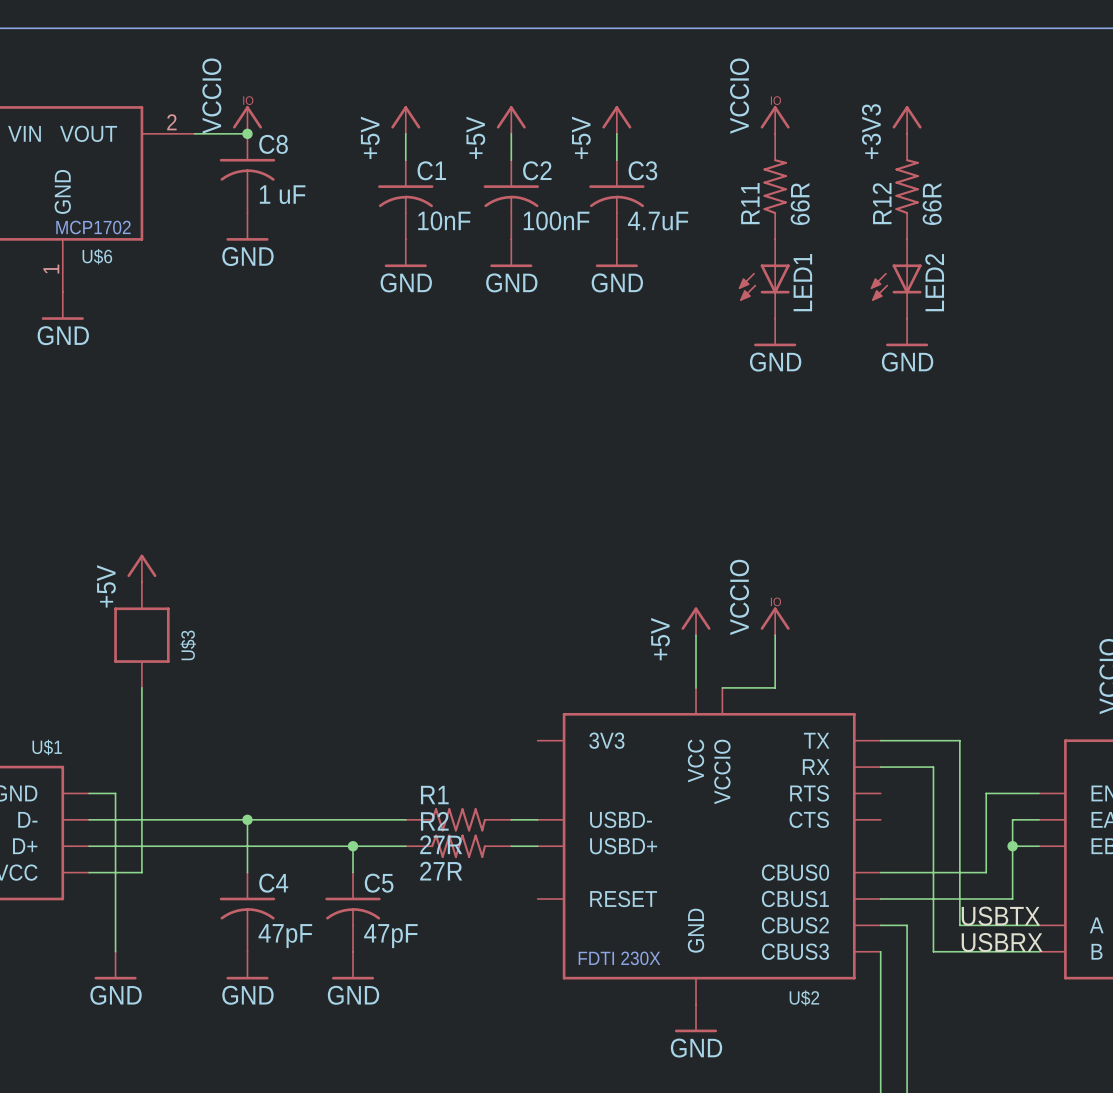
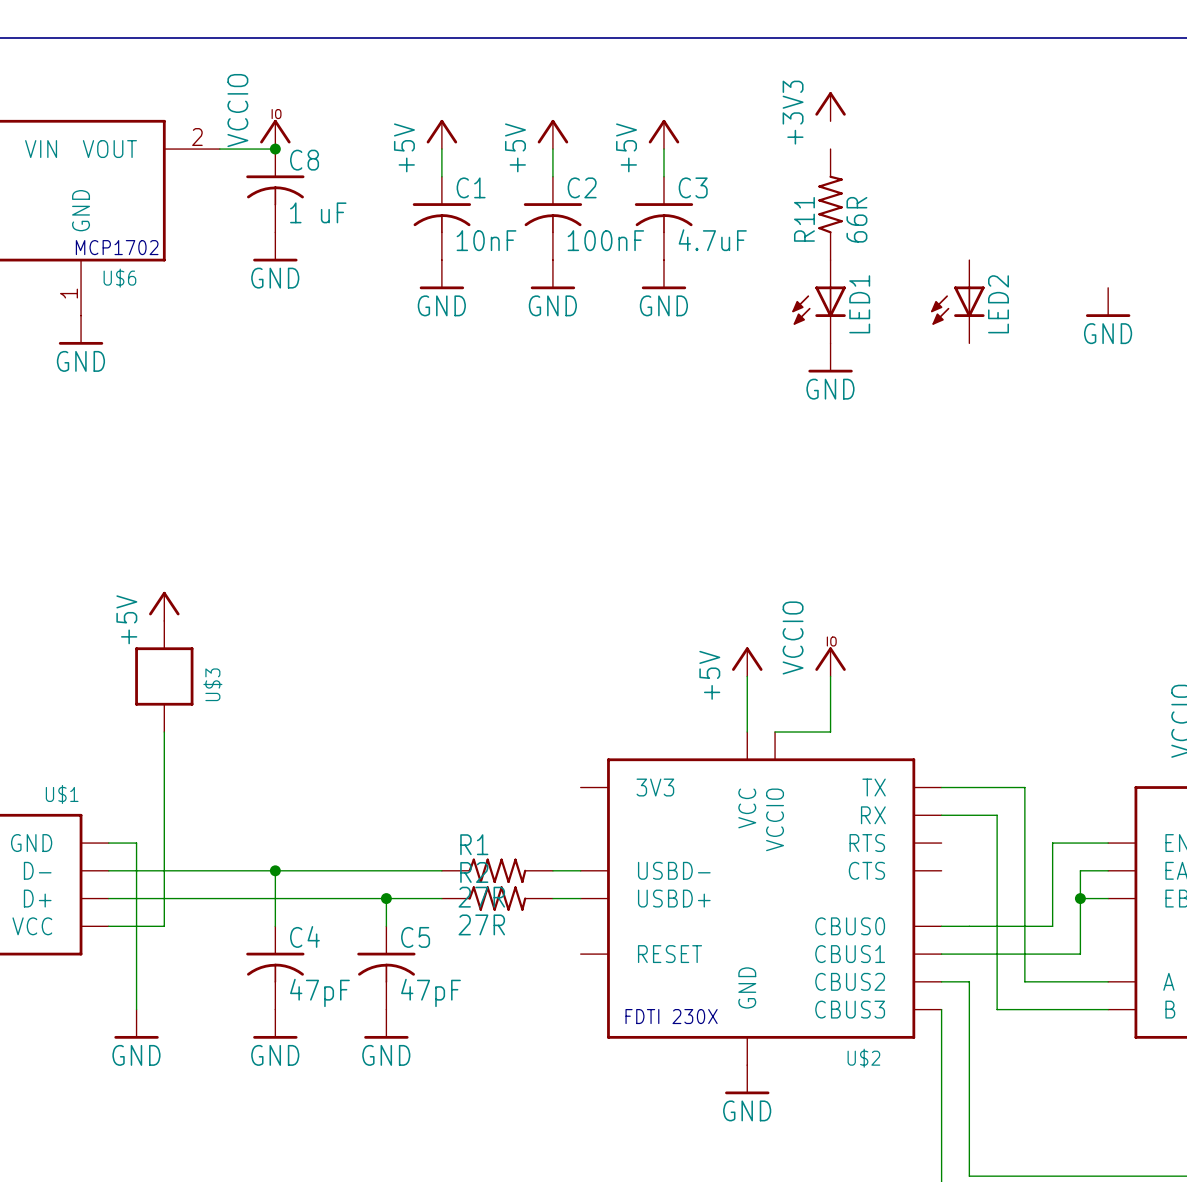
power symbol: VCCIO (775, 119) -> none
power symbol position: +3V3 (907, 119) -> +3V3 (830, 106)
R12: 66R (907, 186) -> none
power symbol position: GND (907, 332) -> GND (1108, 302)
label: USBTX (1000, 916) -> none
label: USBRX (1002, 942) -> none

